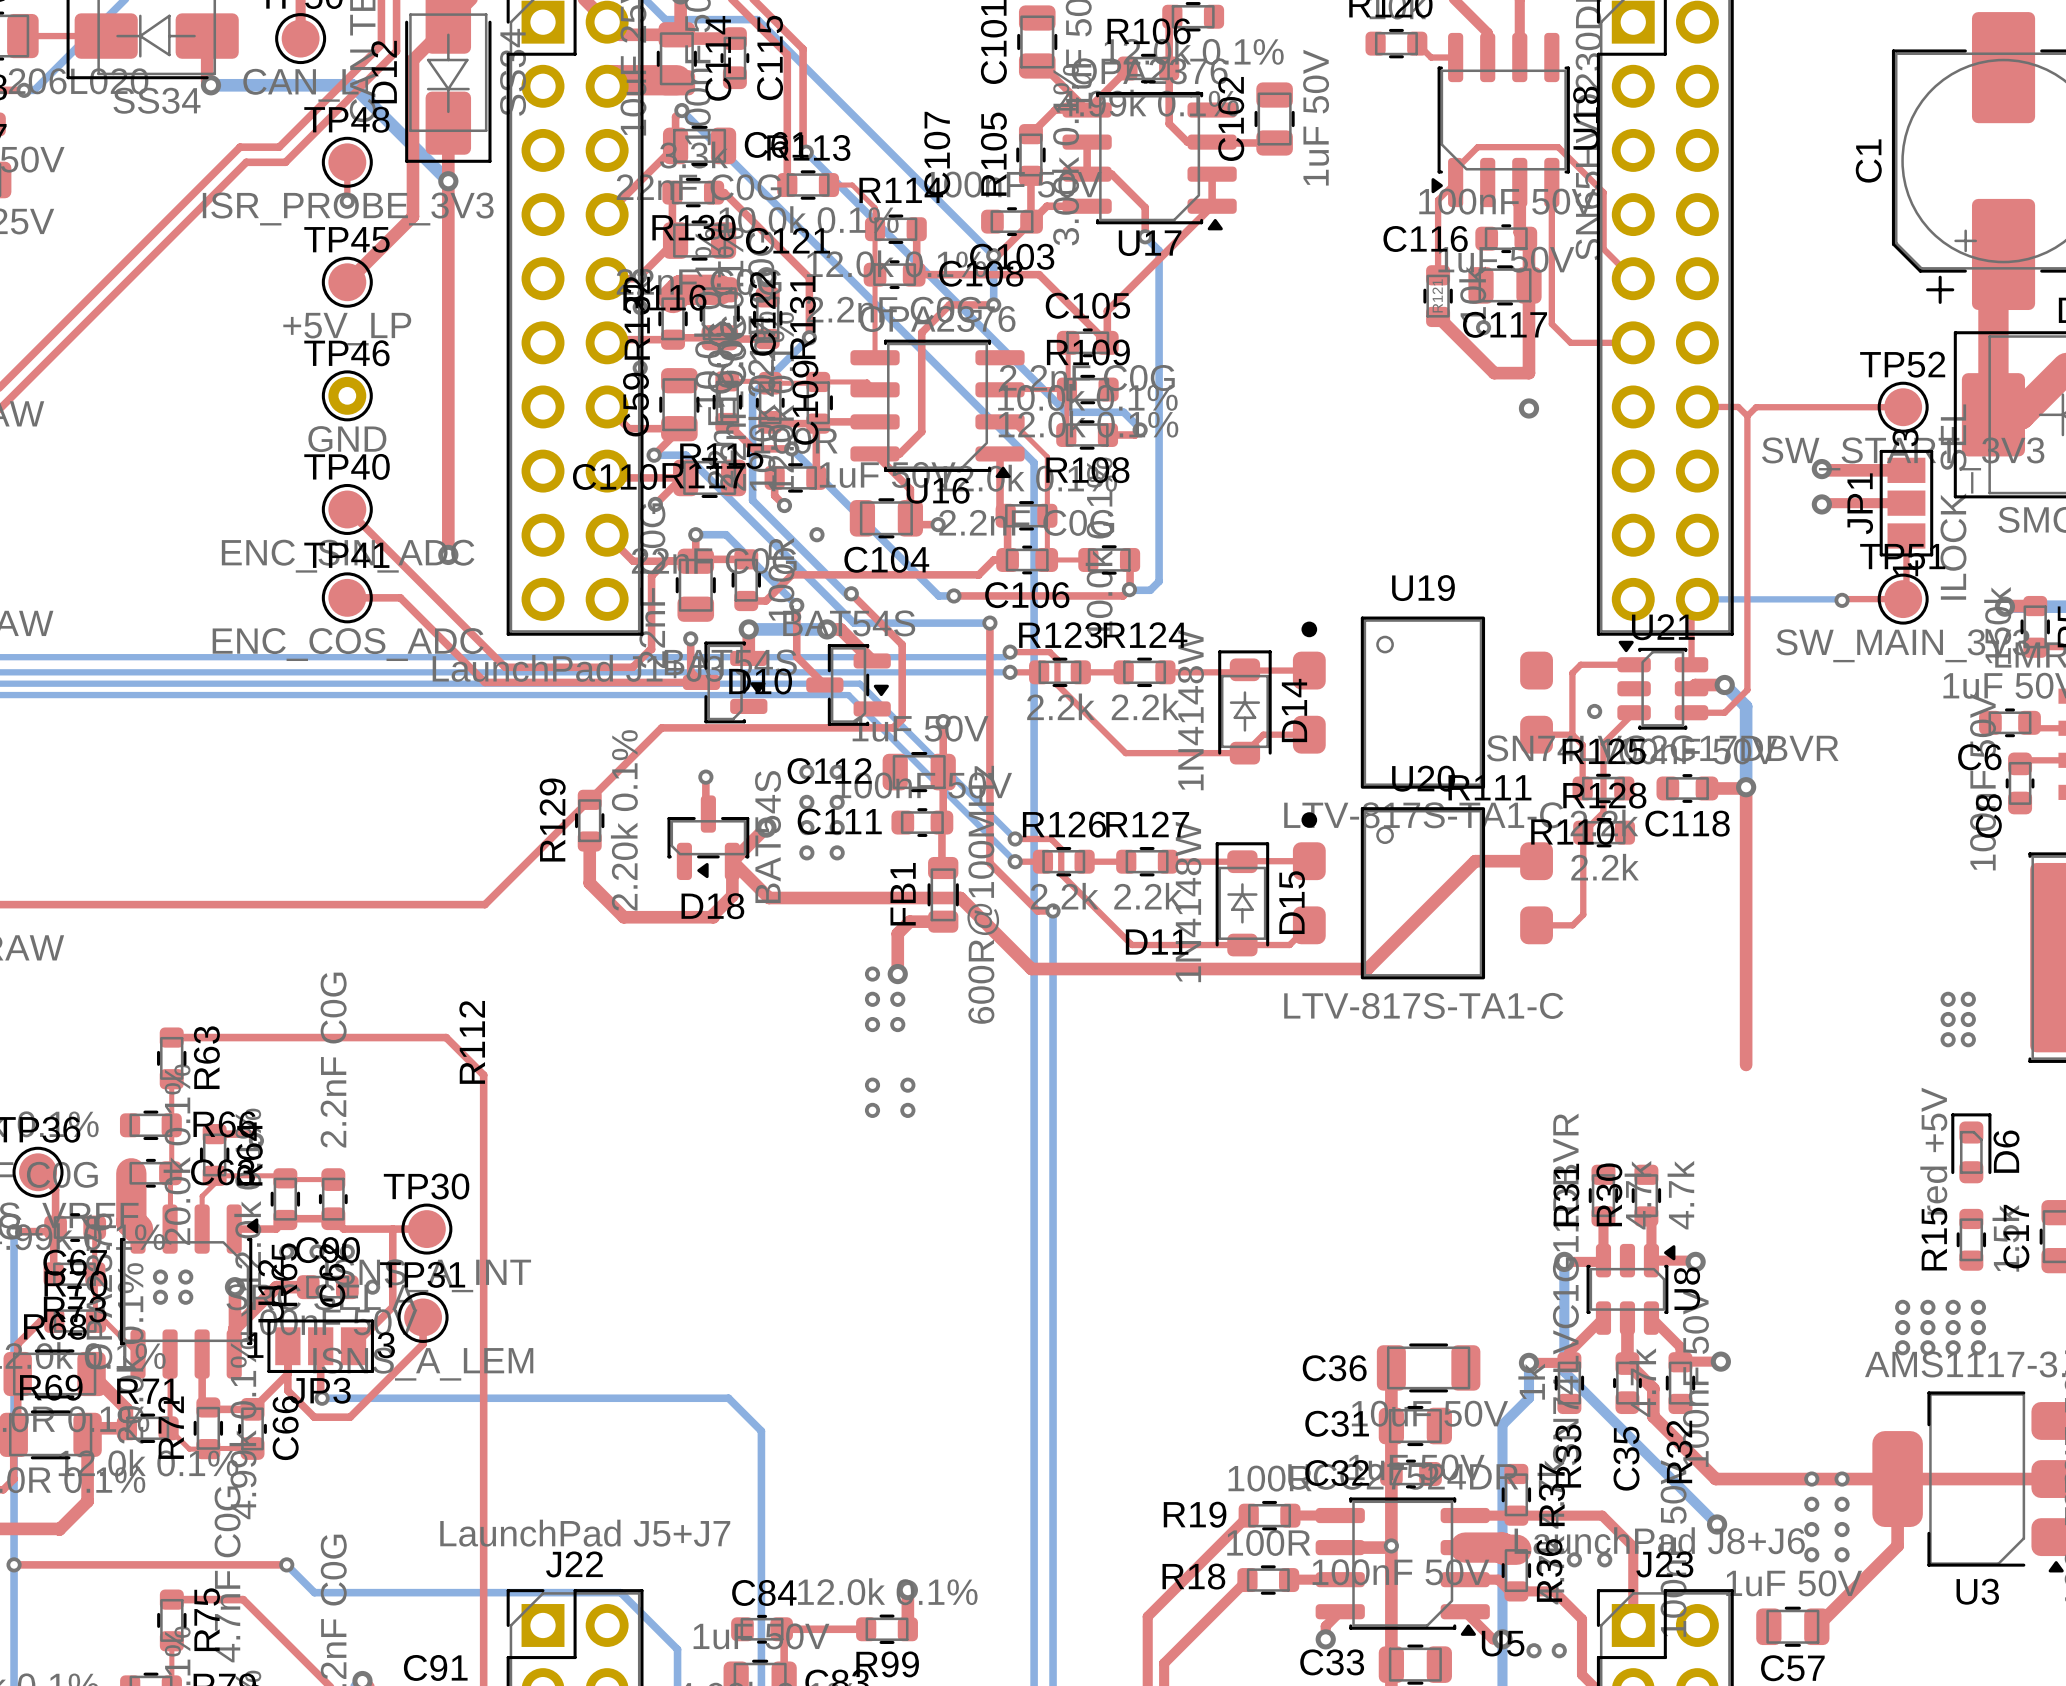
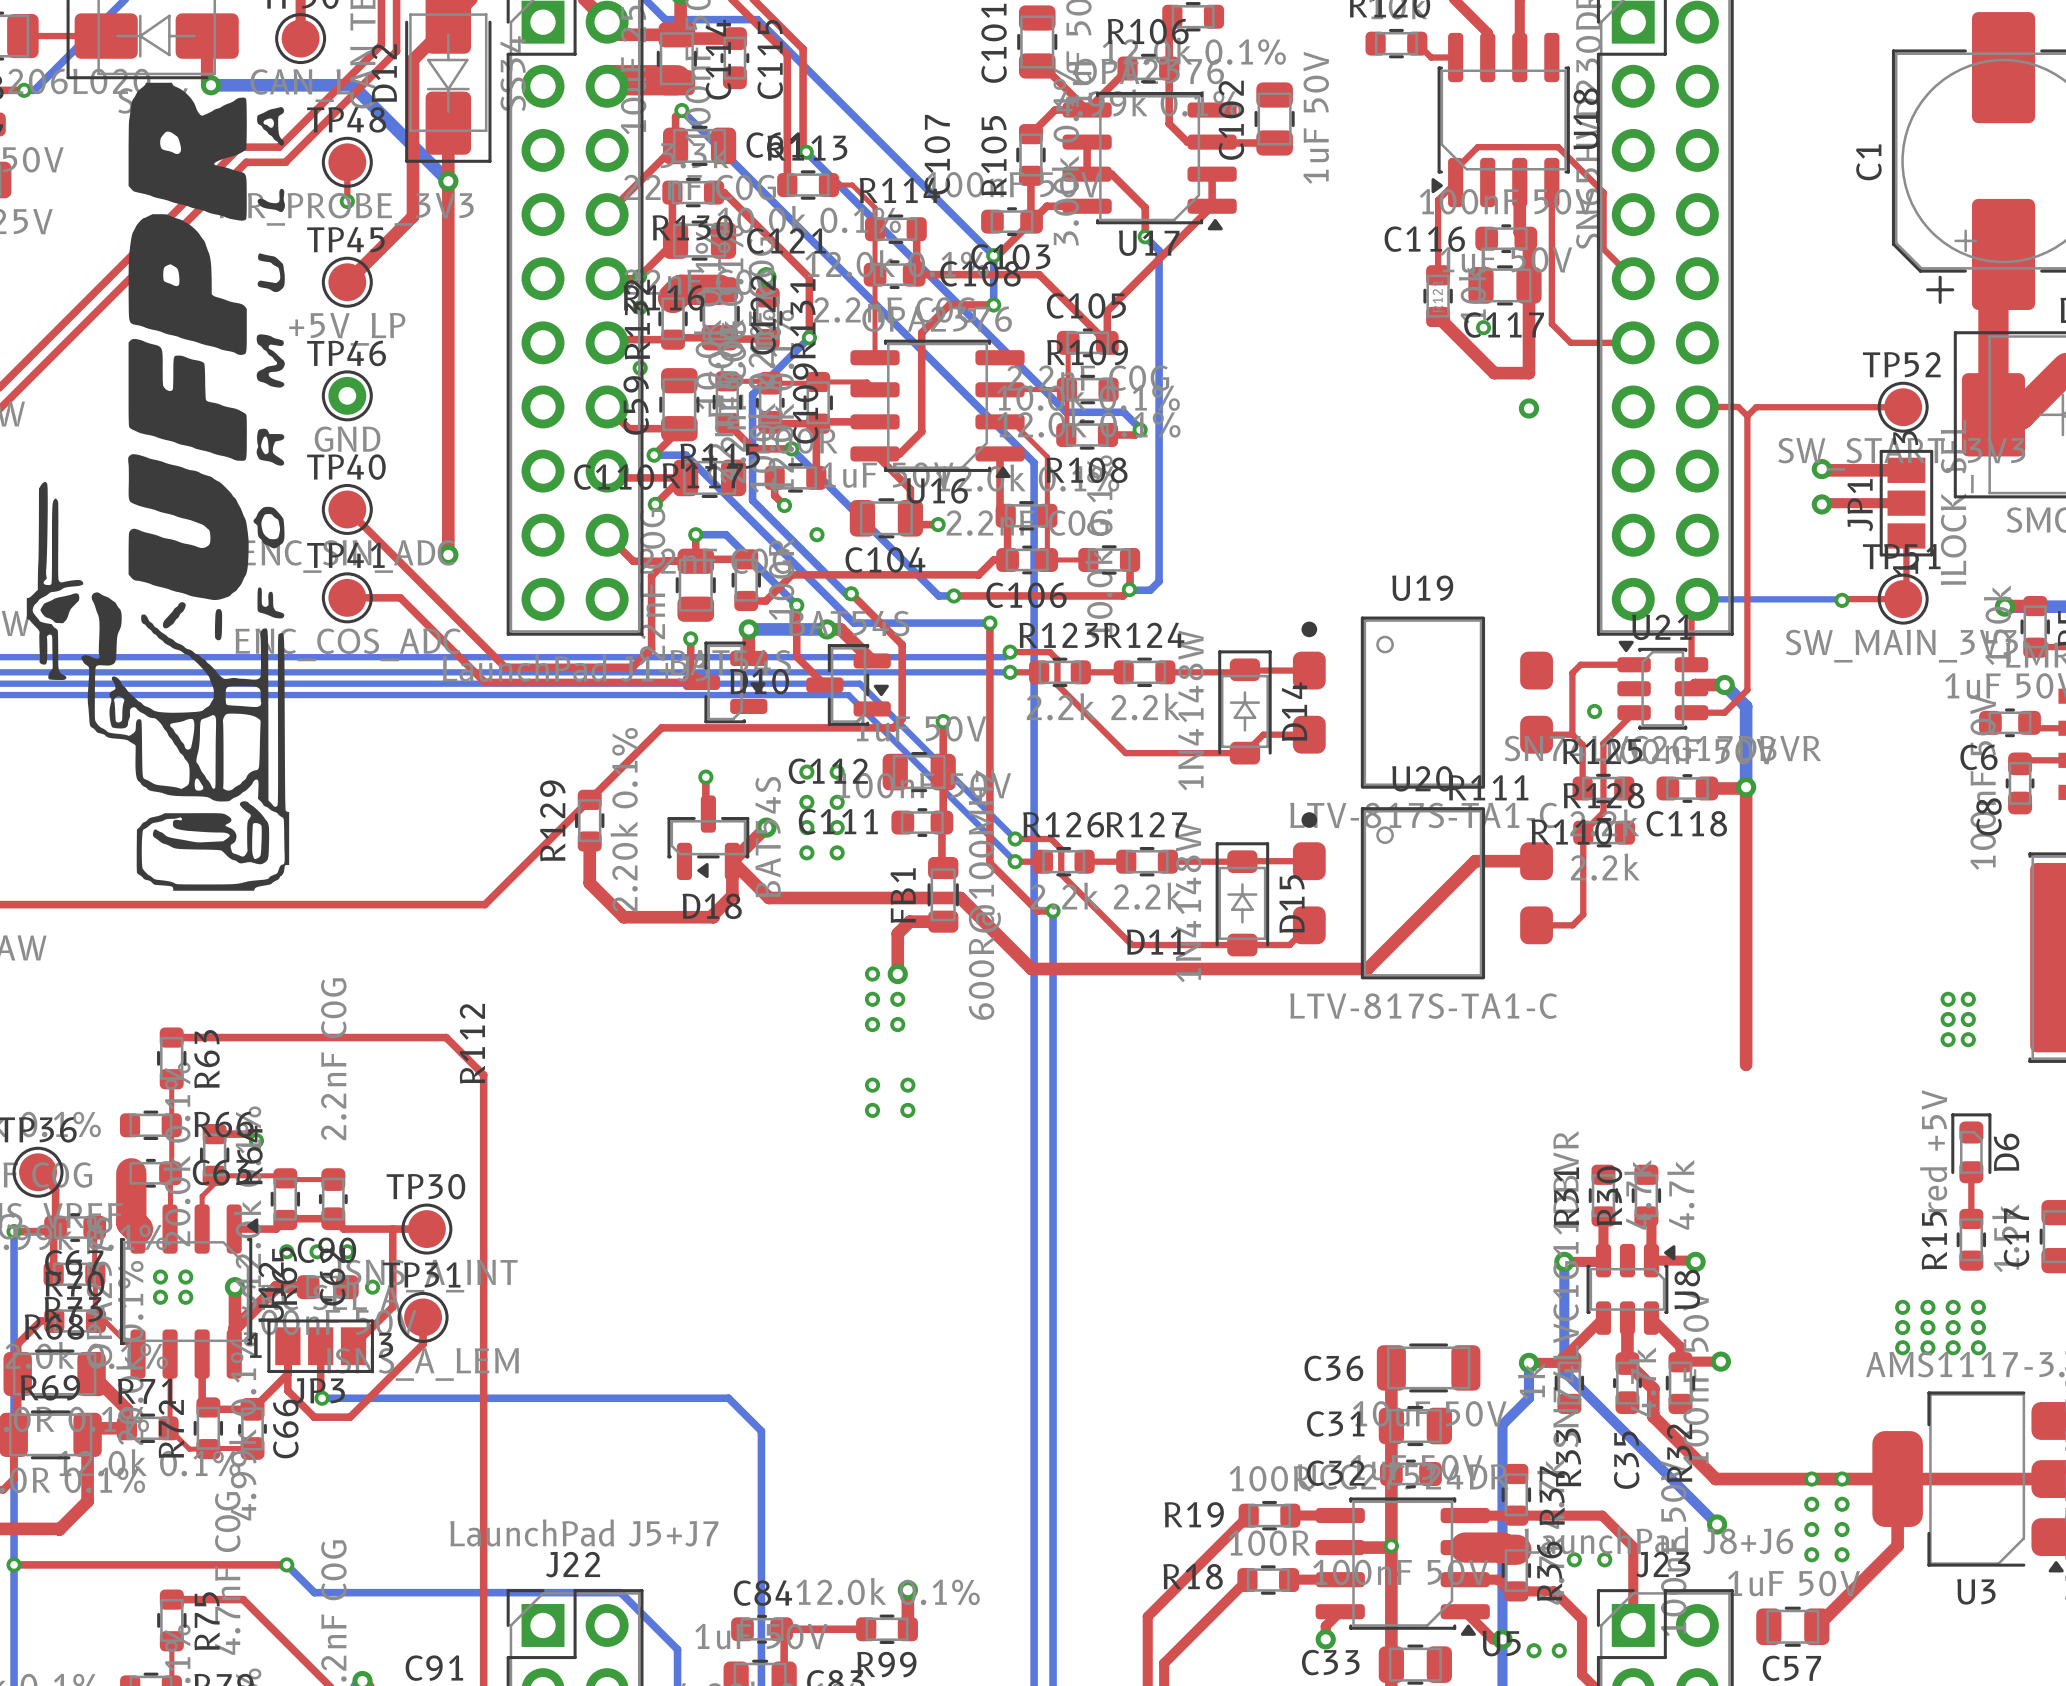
drawing: none -> [26, 82, 290, 891]
top track: none -> (1971, 1172) (1971, 1218)

